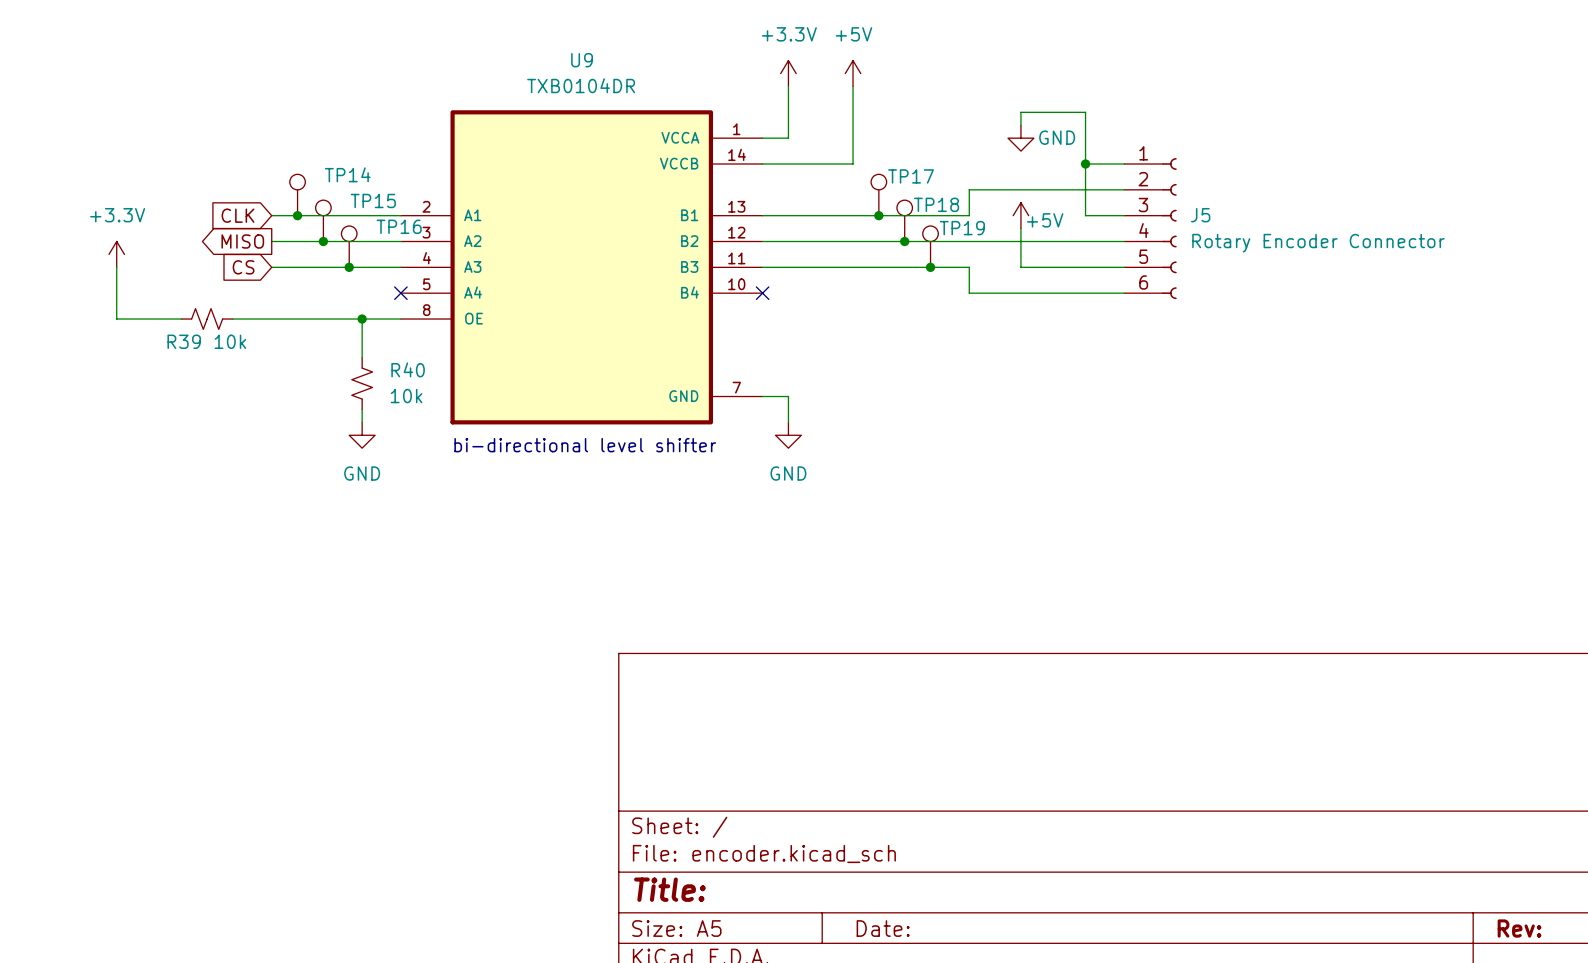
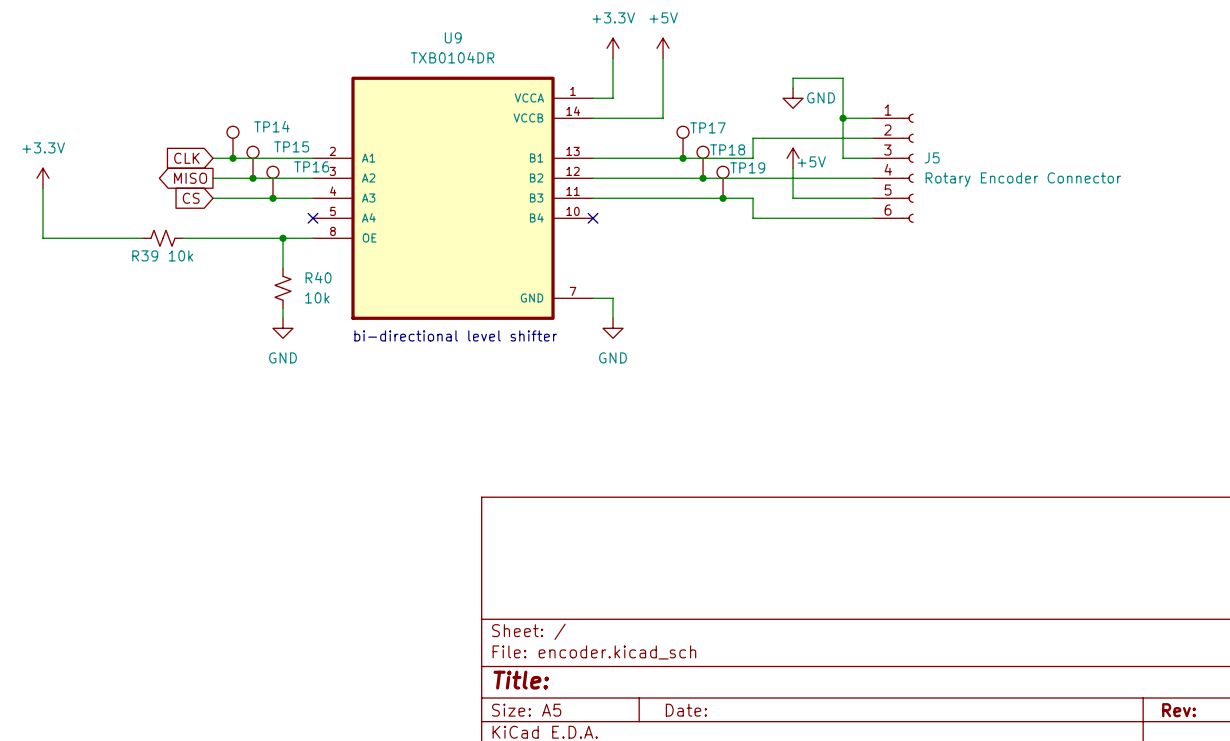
power symbol position: +3.3V (116, 254) -> +3.3V (42, 178)
wire: (116, 267) (116, 319) -> (42, 188) (42, 238) (92, 238)

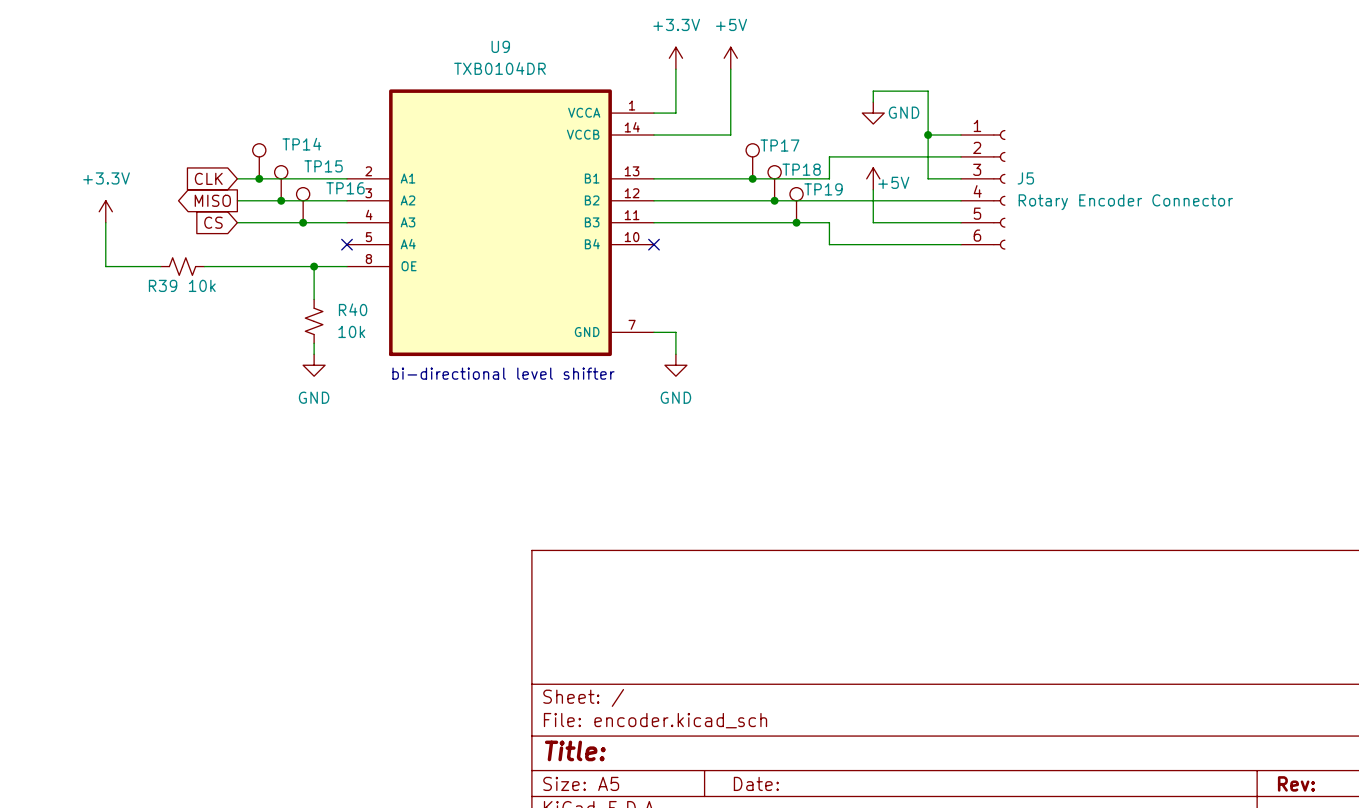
power symbol position: +3.3V (42, 178) -> +3.3V (105, 211)
wire: (42, 188) (42, 238) (92, 238) -> (105, 222) (105, 266)

